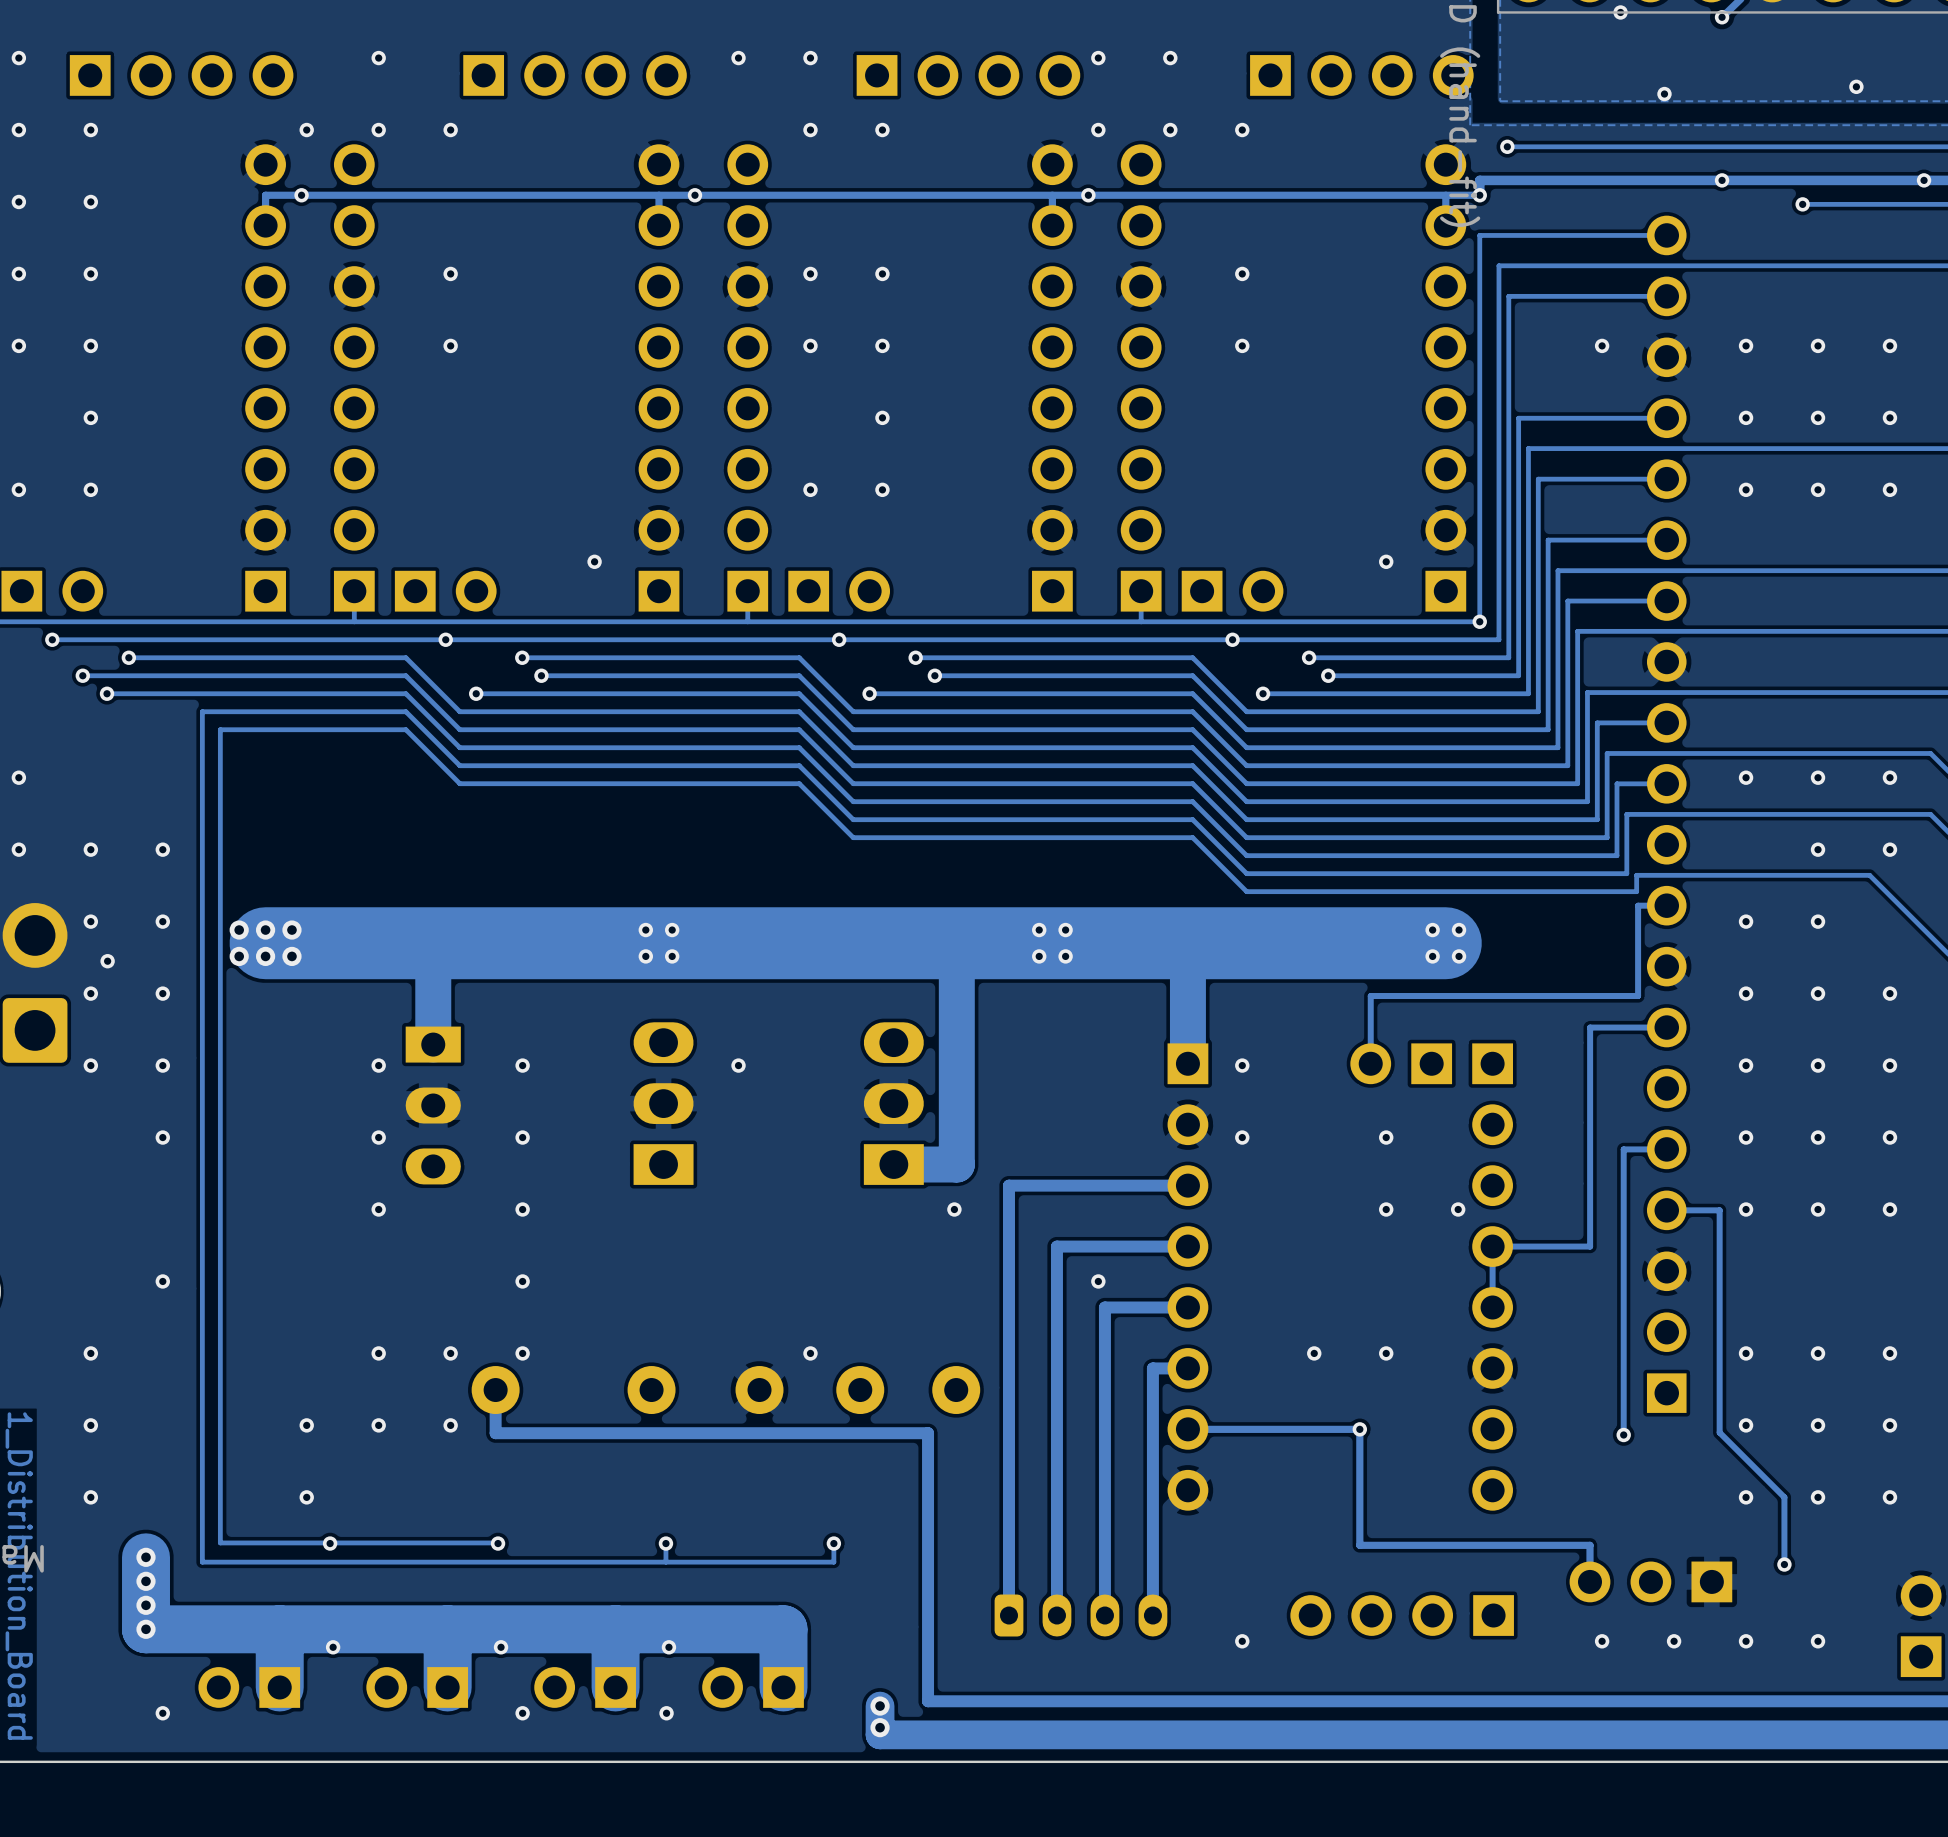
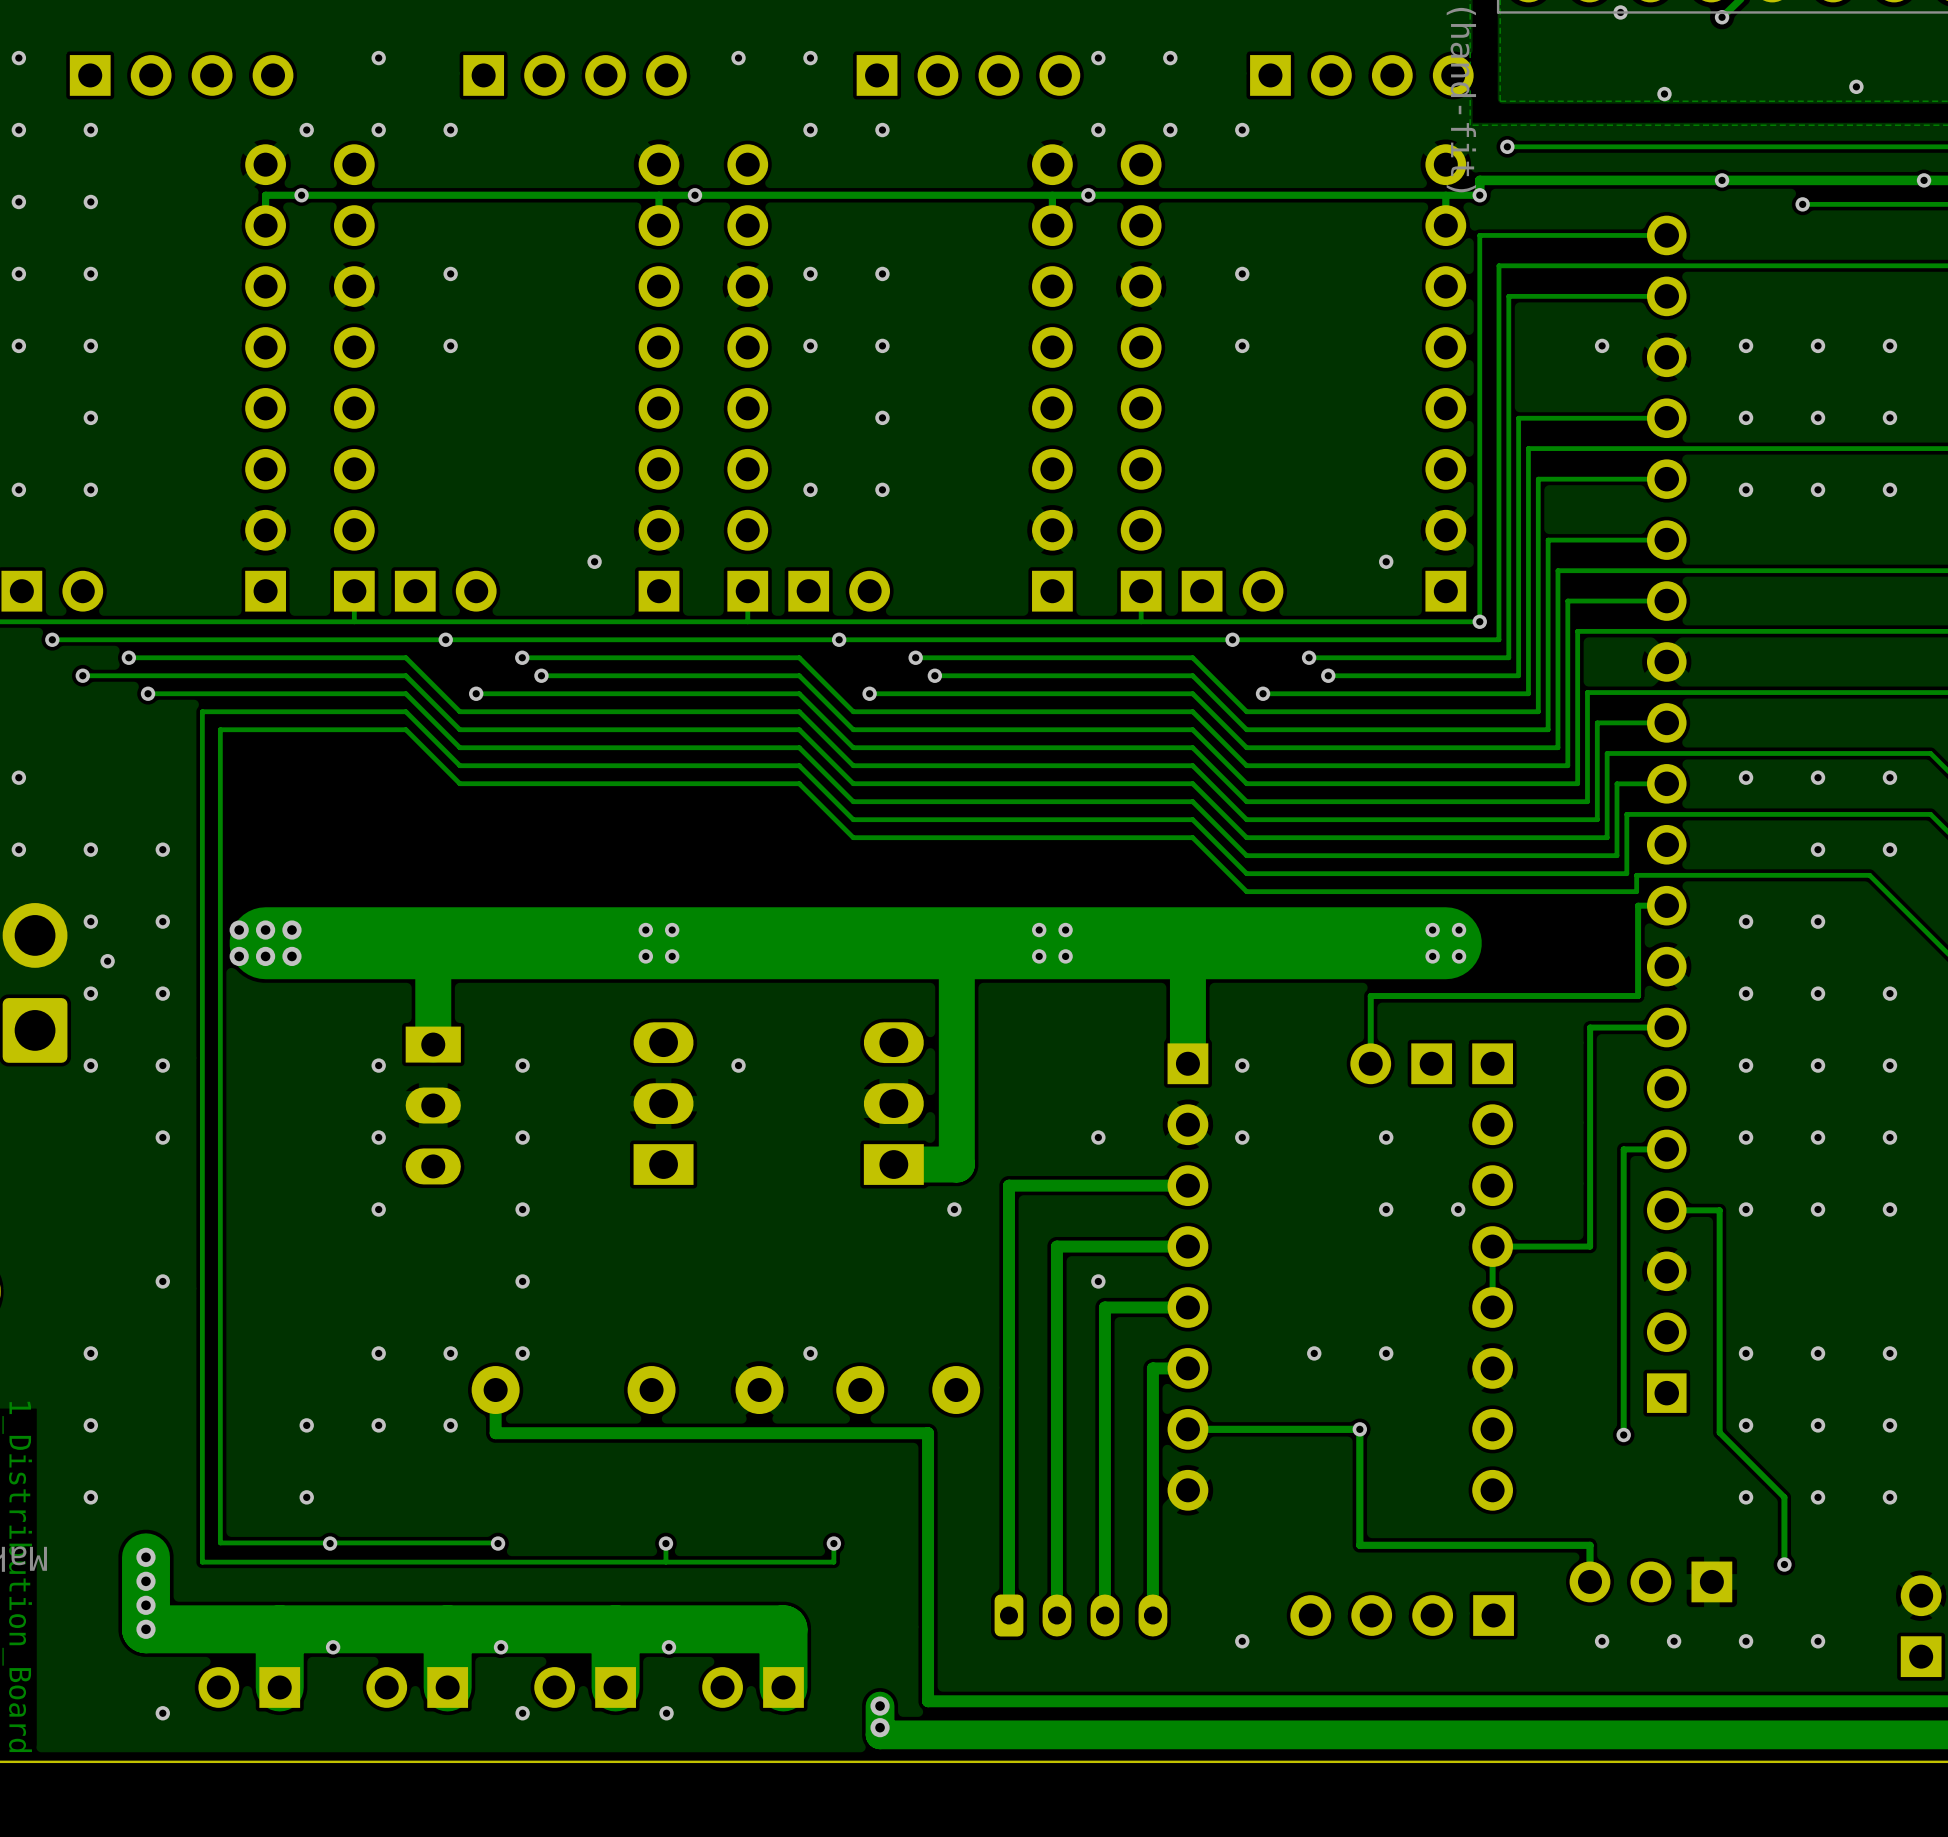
via position: (107, 693) -> (148, 693)
track: (148, 693) (107, 693) -> none
via: none -> (1098, 1137)

